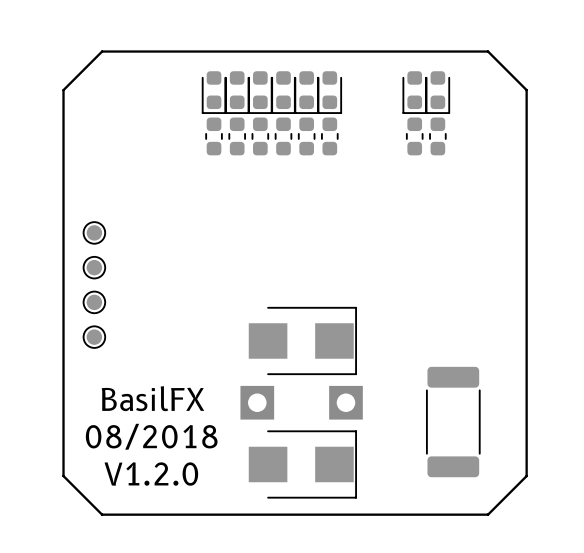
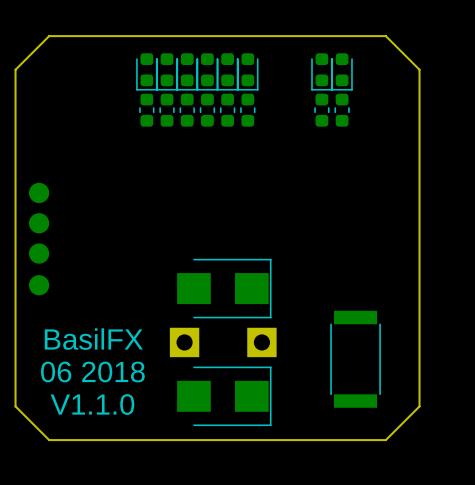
part footprint: [82, 221, 107, 245] -> [29, 182, 50, 204]
part footprint: [82, 255, 107, 280] -> [29, 213, 50, 234]
part footprint: [82, 290, 107, 315] -> [29, 243, 50, 264]
part footprint: [82, 325, 107, 349] -> [29, 275, 50, 296]
part footprint: [425, 366, 481, 478] -> [330, 310, 381, 408]
text: 08/2018 (151, 436) -> 06 2018 (92, 371)
text: V1.2.0 (151, 474) -> V1.1.0 (92, 404)

